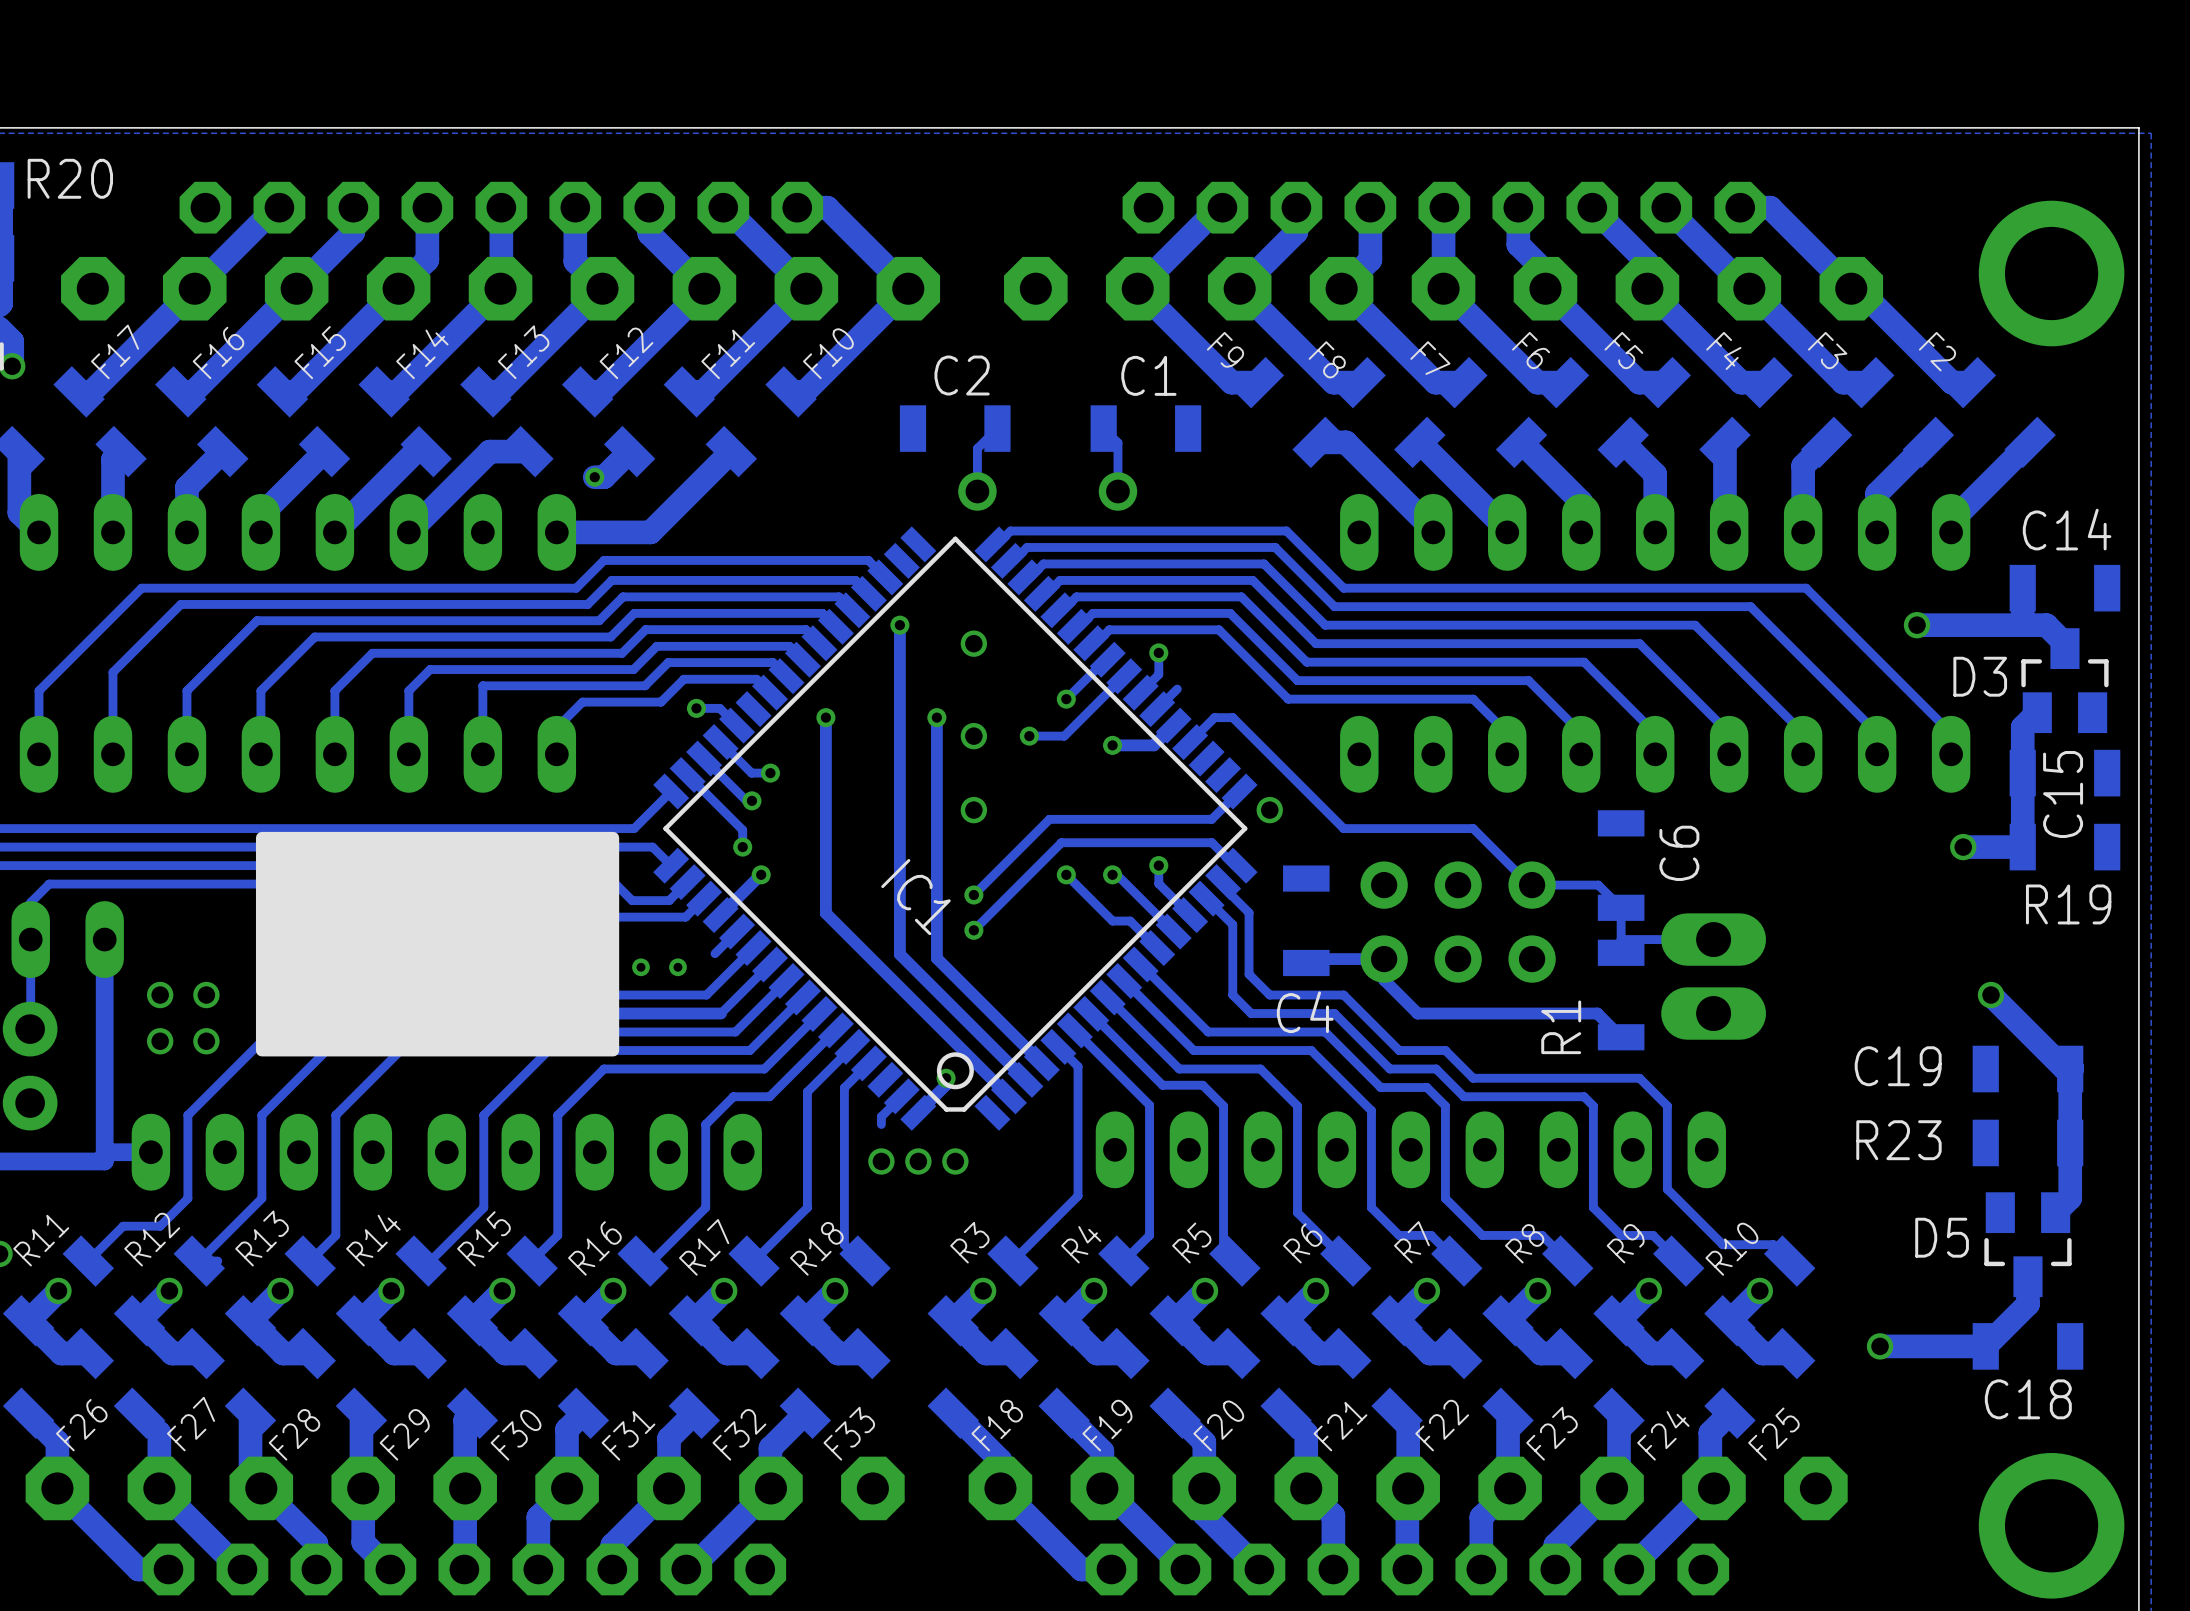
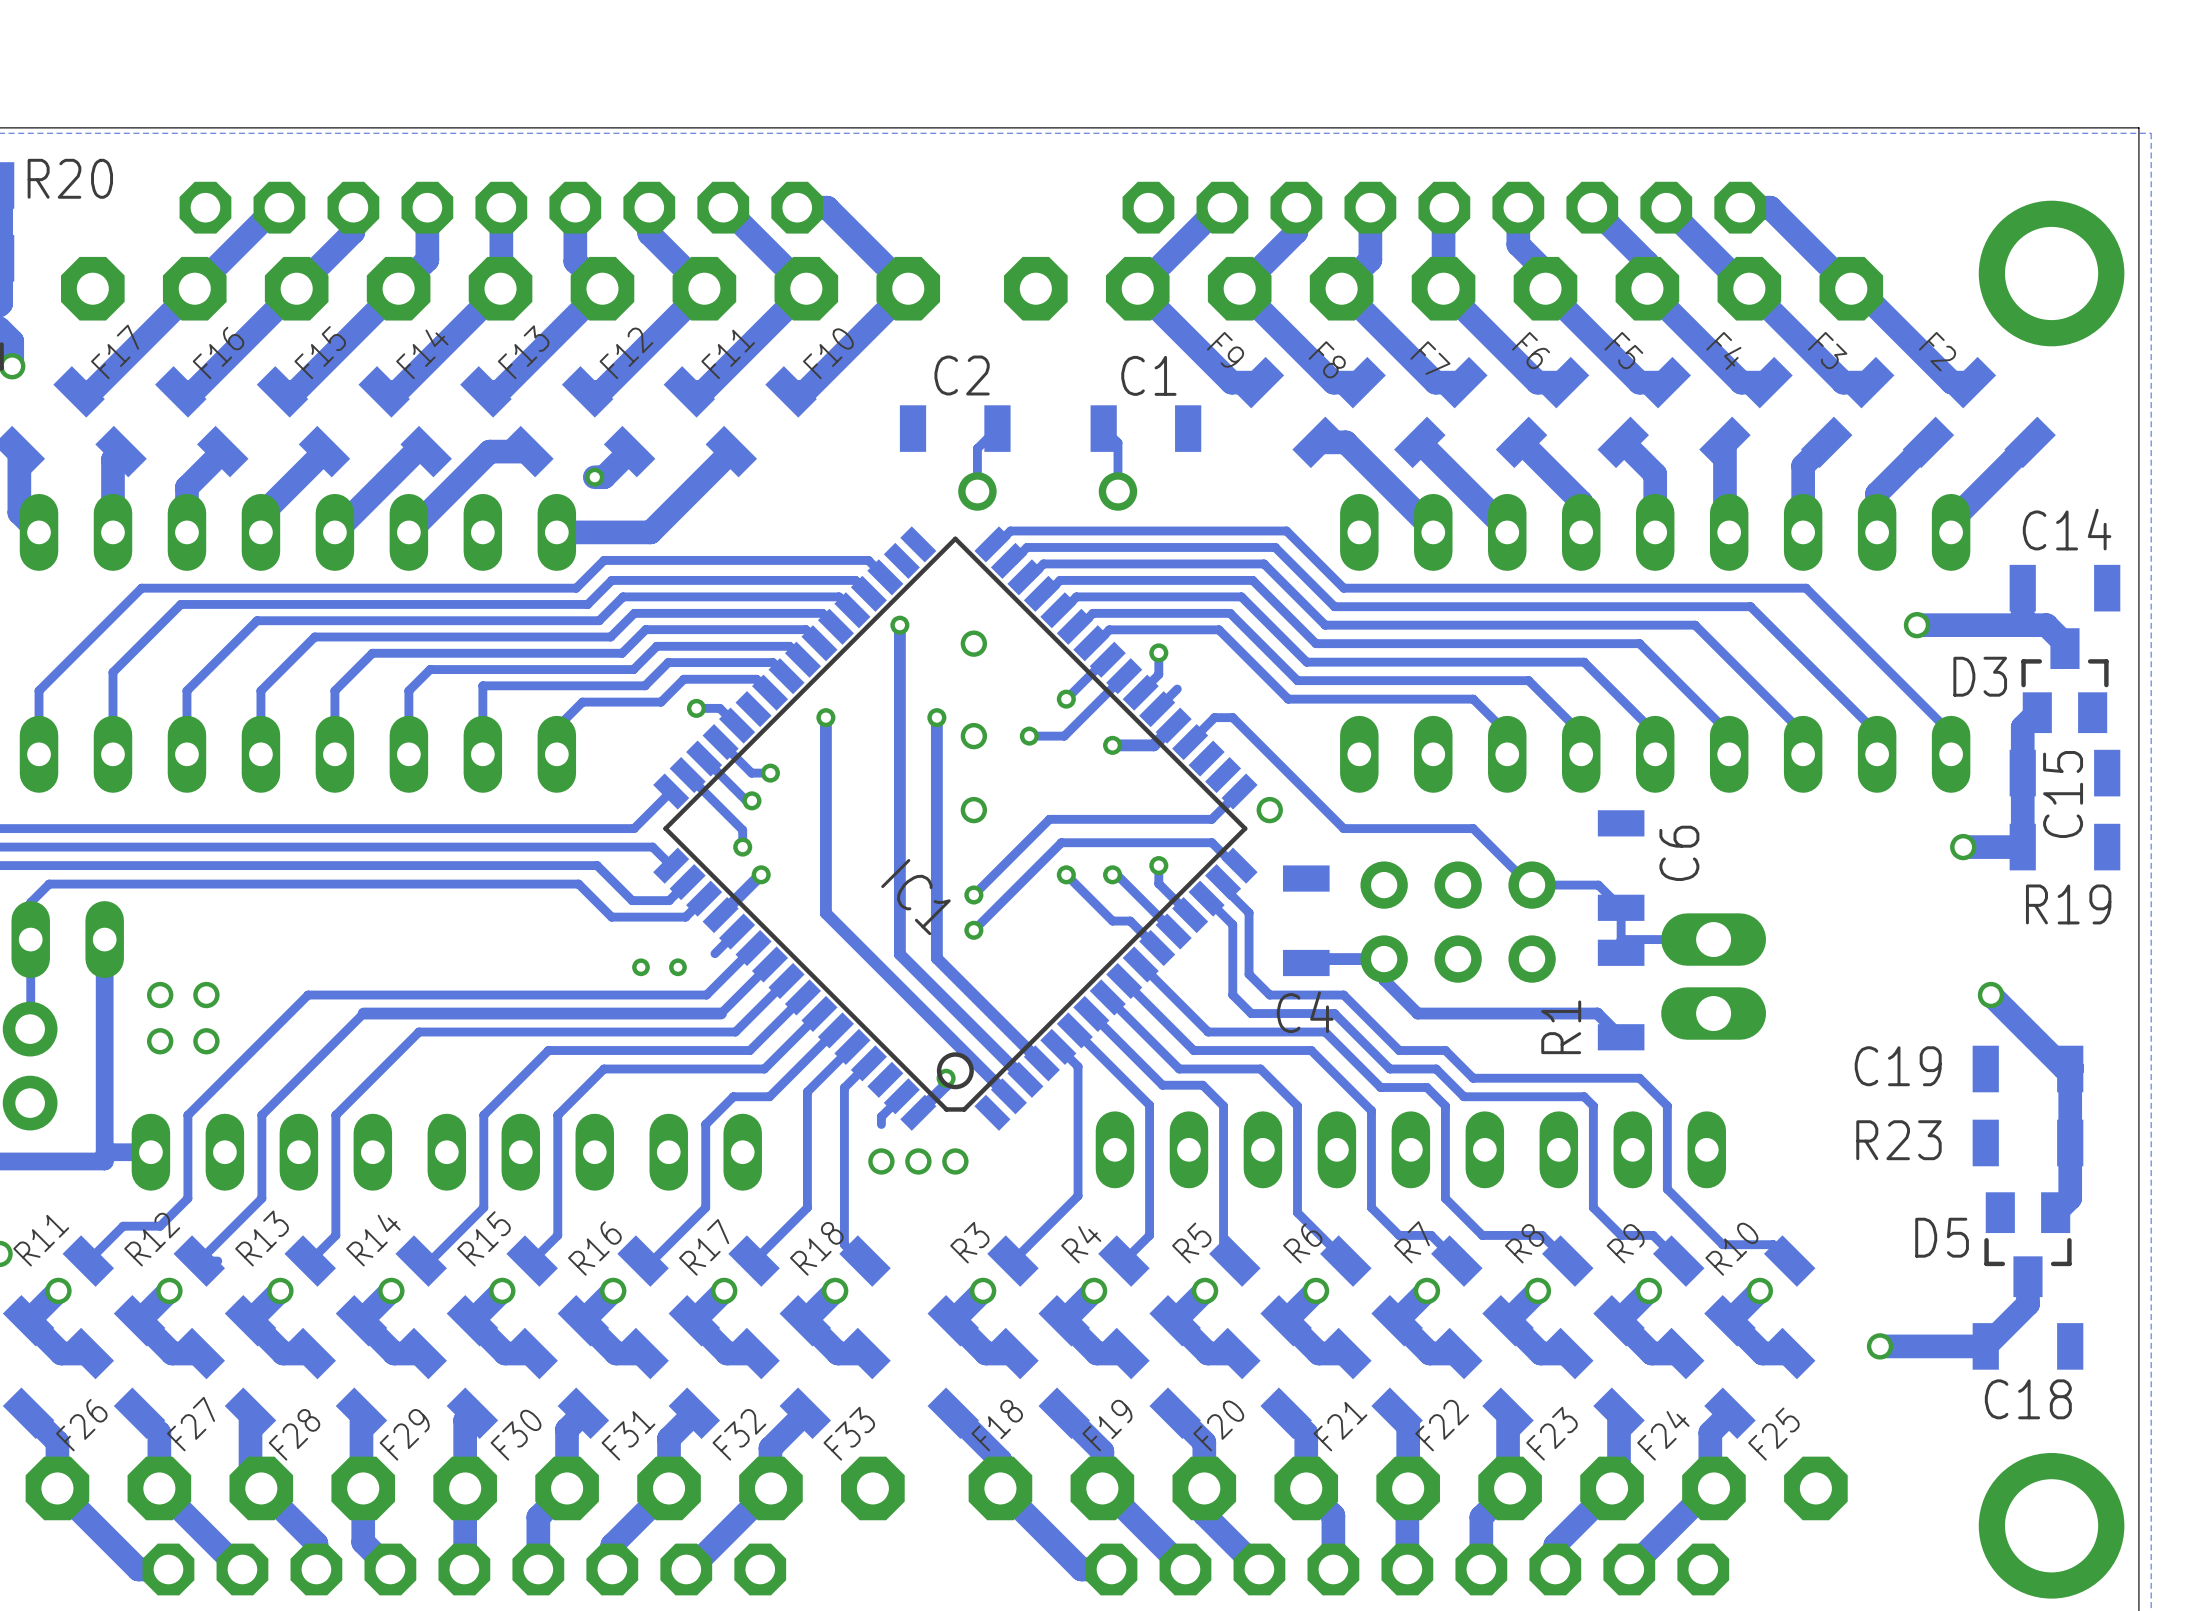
drawing: [255, 831, 620, 1057] -> none

